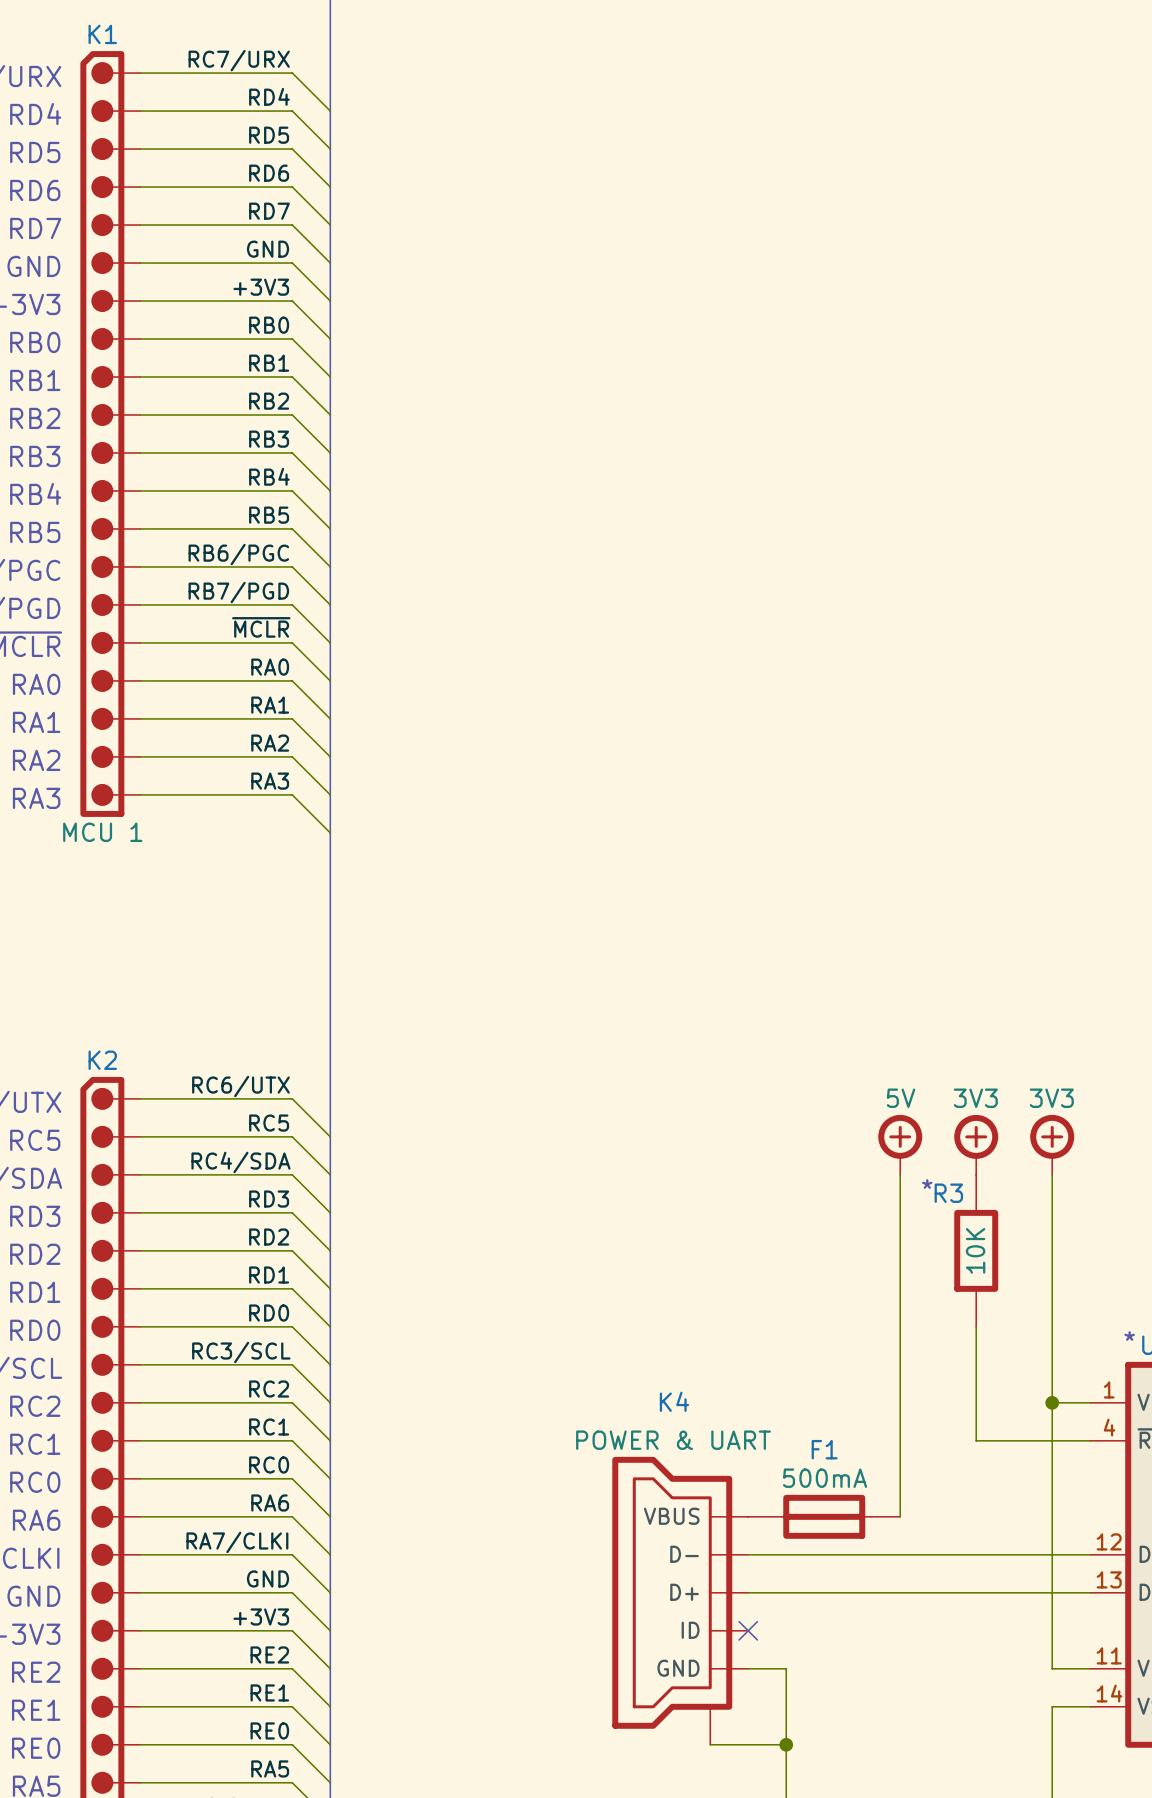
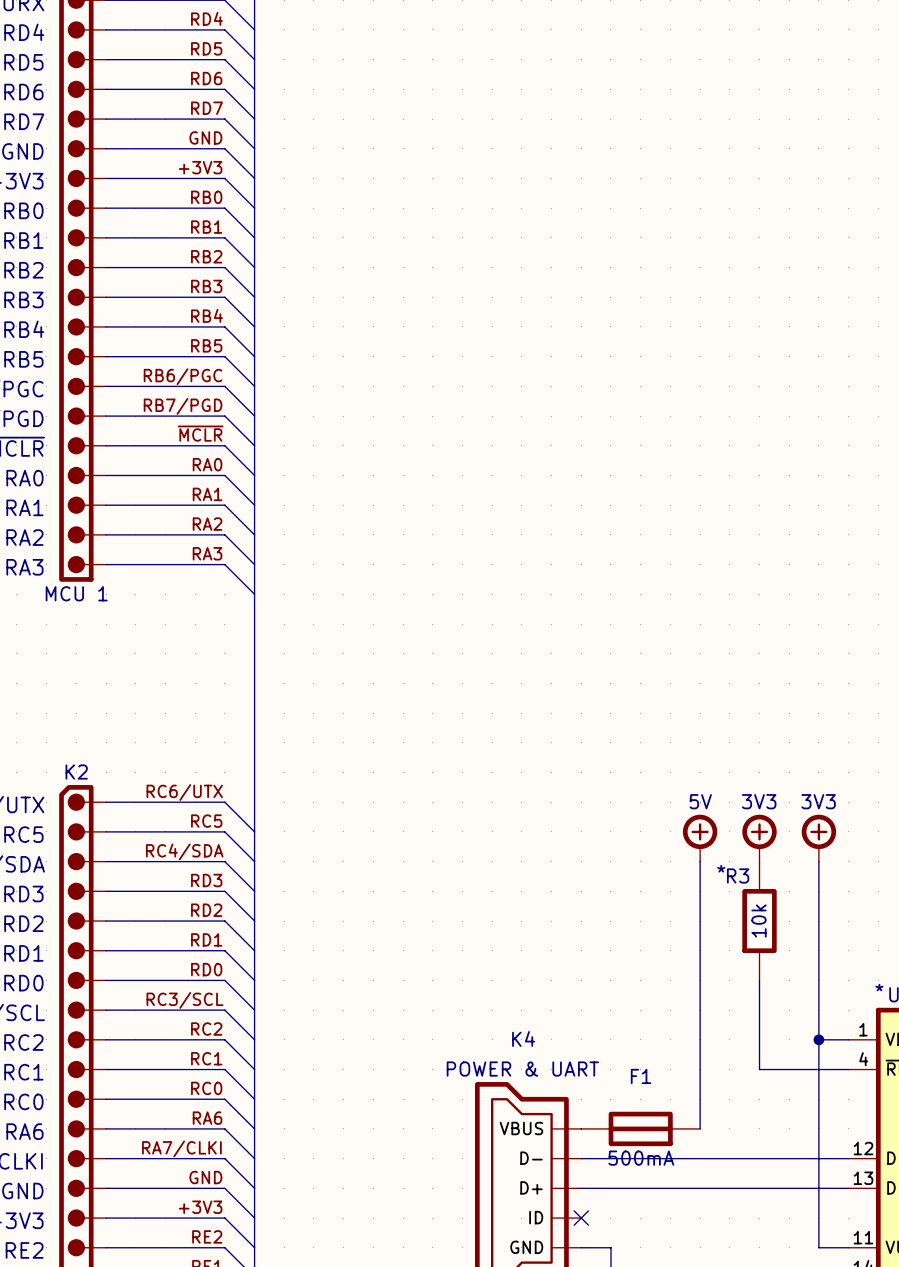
R3 value: 10K (975, 1250) -> 10k (759, 921)
F1 value position: 500mA (825, 1478) -> 500mA (641, 1158)

